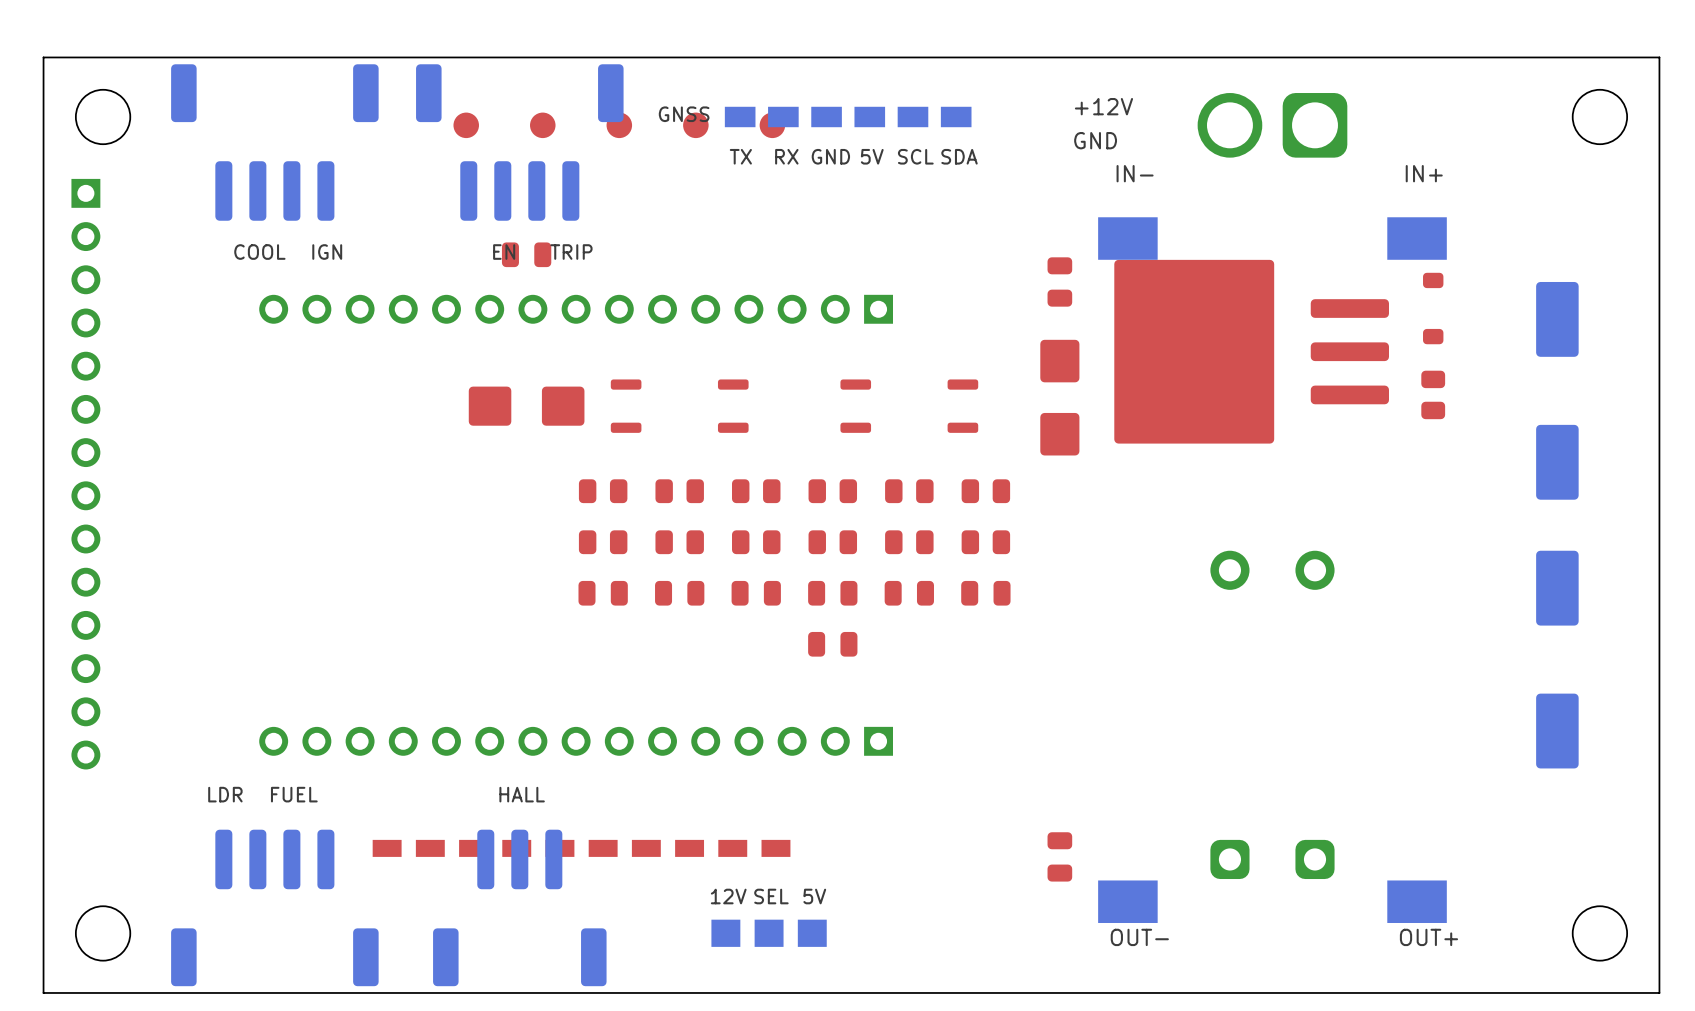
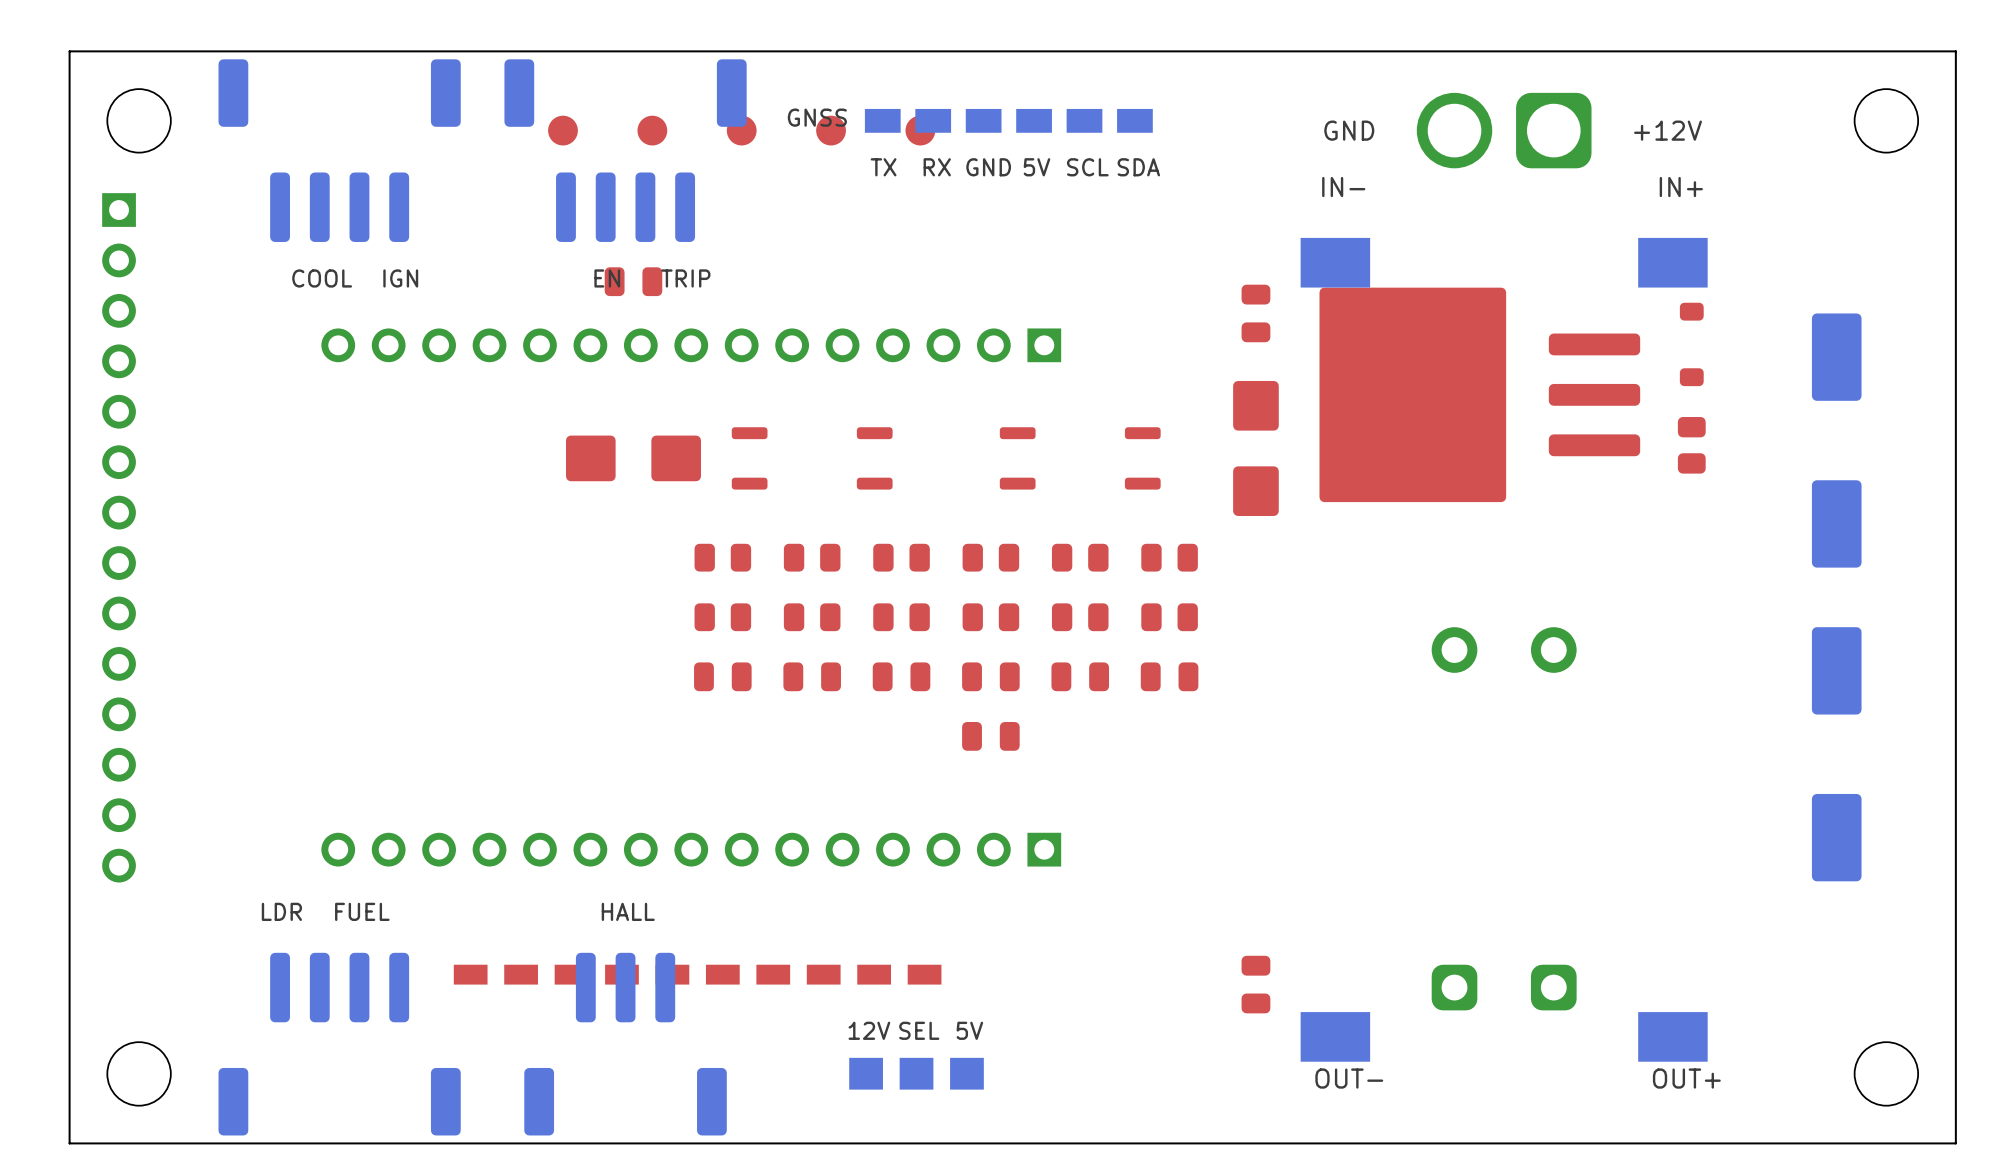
text position: +12V (1103, 106) -> +12V (1668, 130)
text position: GND (1095, 140) -> GND (1349, 130)

